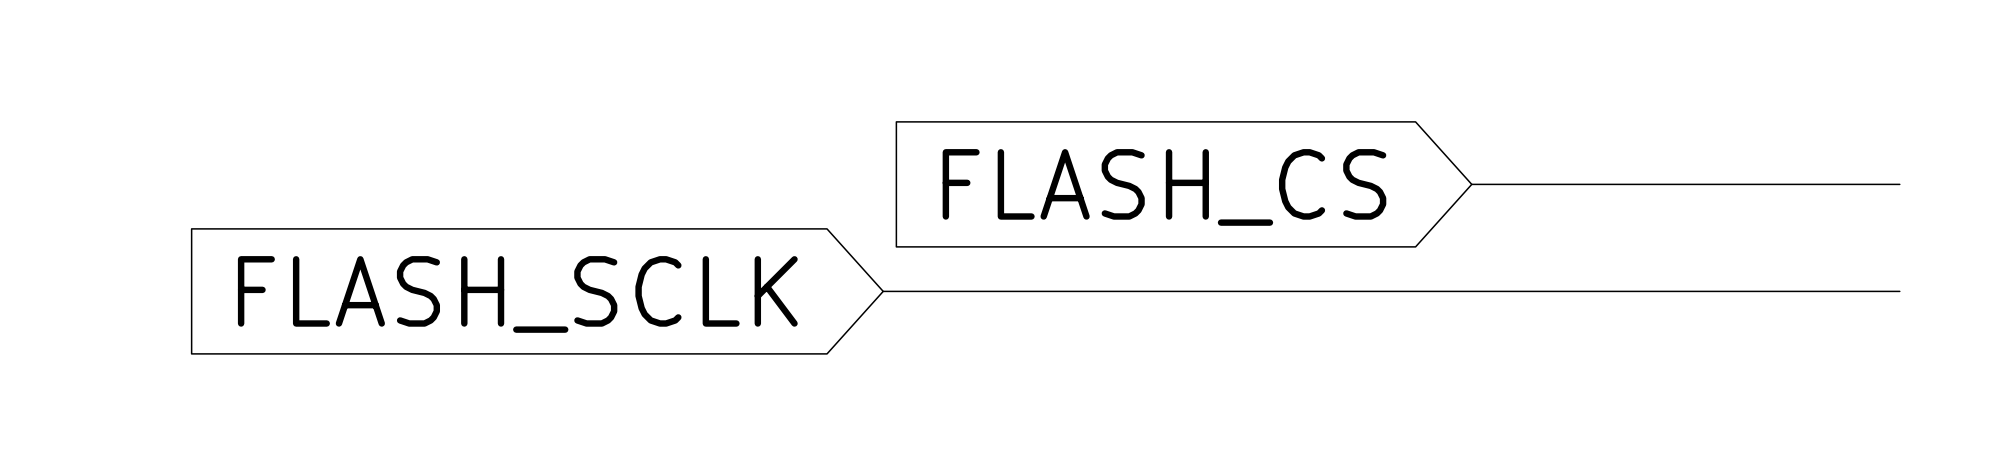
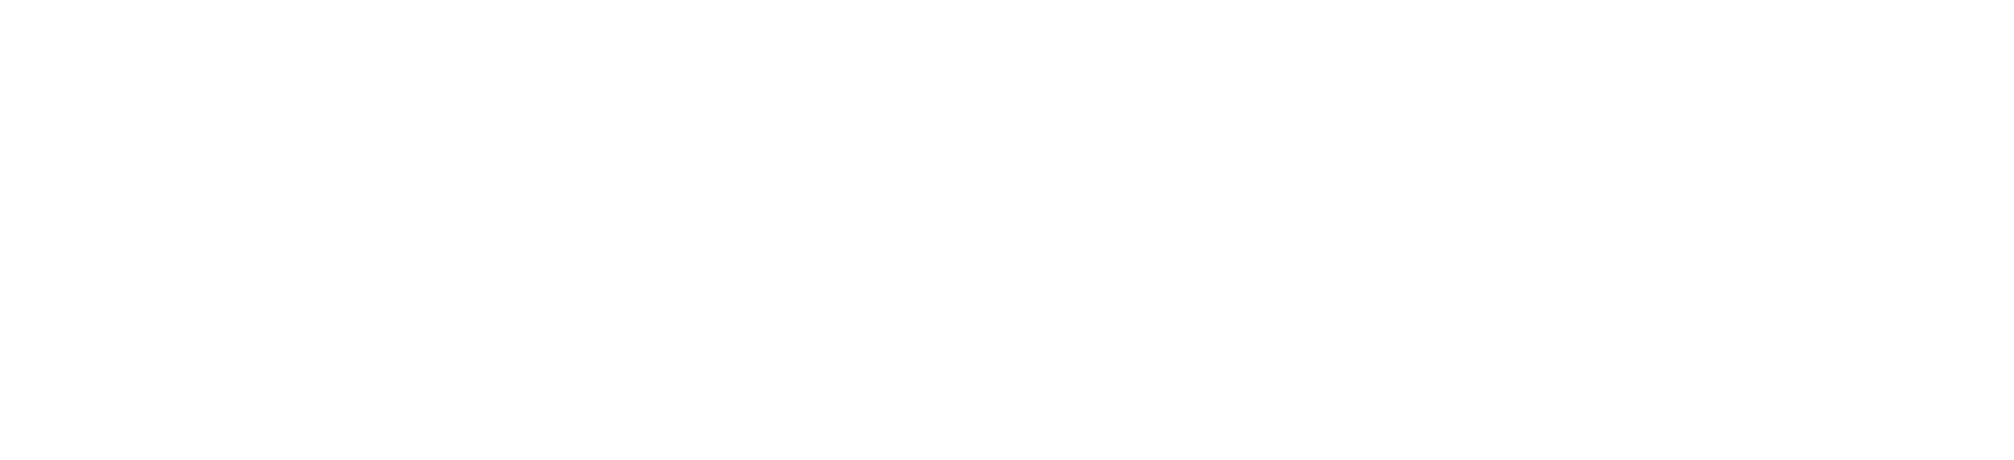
wire: (1471, 184) (1899, 184) -> none
global label: FLASH_CS (1164, 187) -> none
wire: (883, 291) (1899, 291) -> none
global label: FLASH_SCLK (517, 294) -> none

